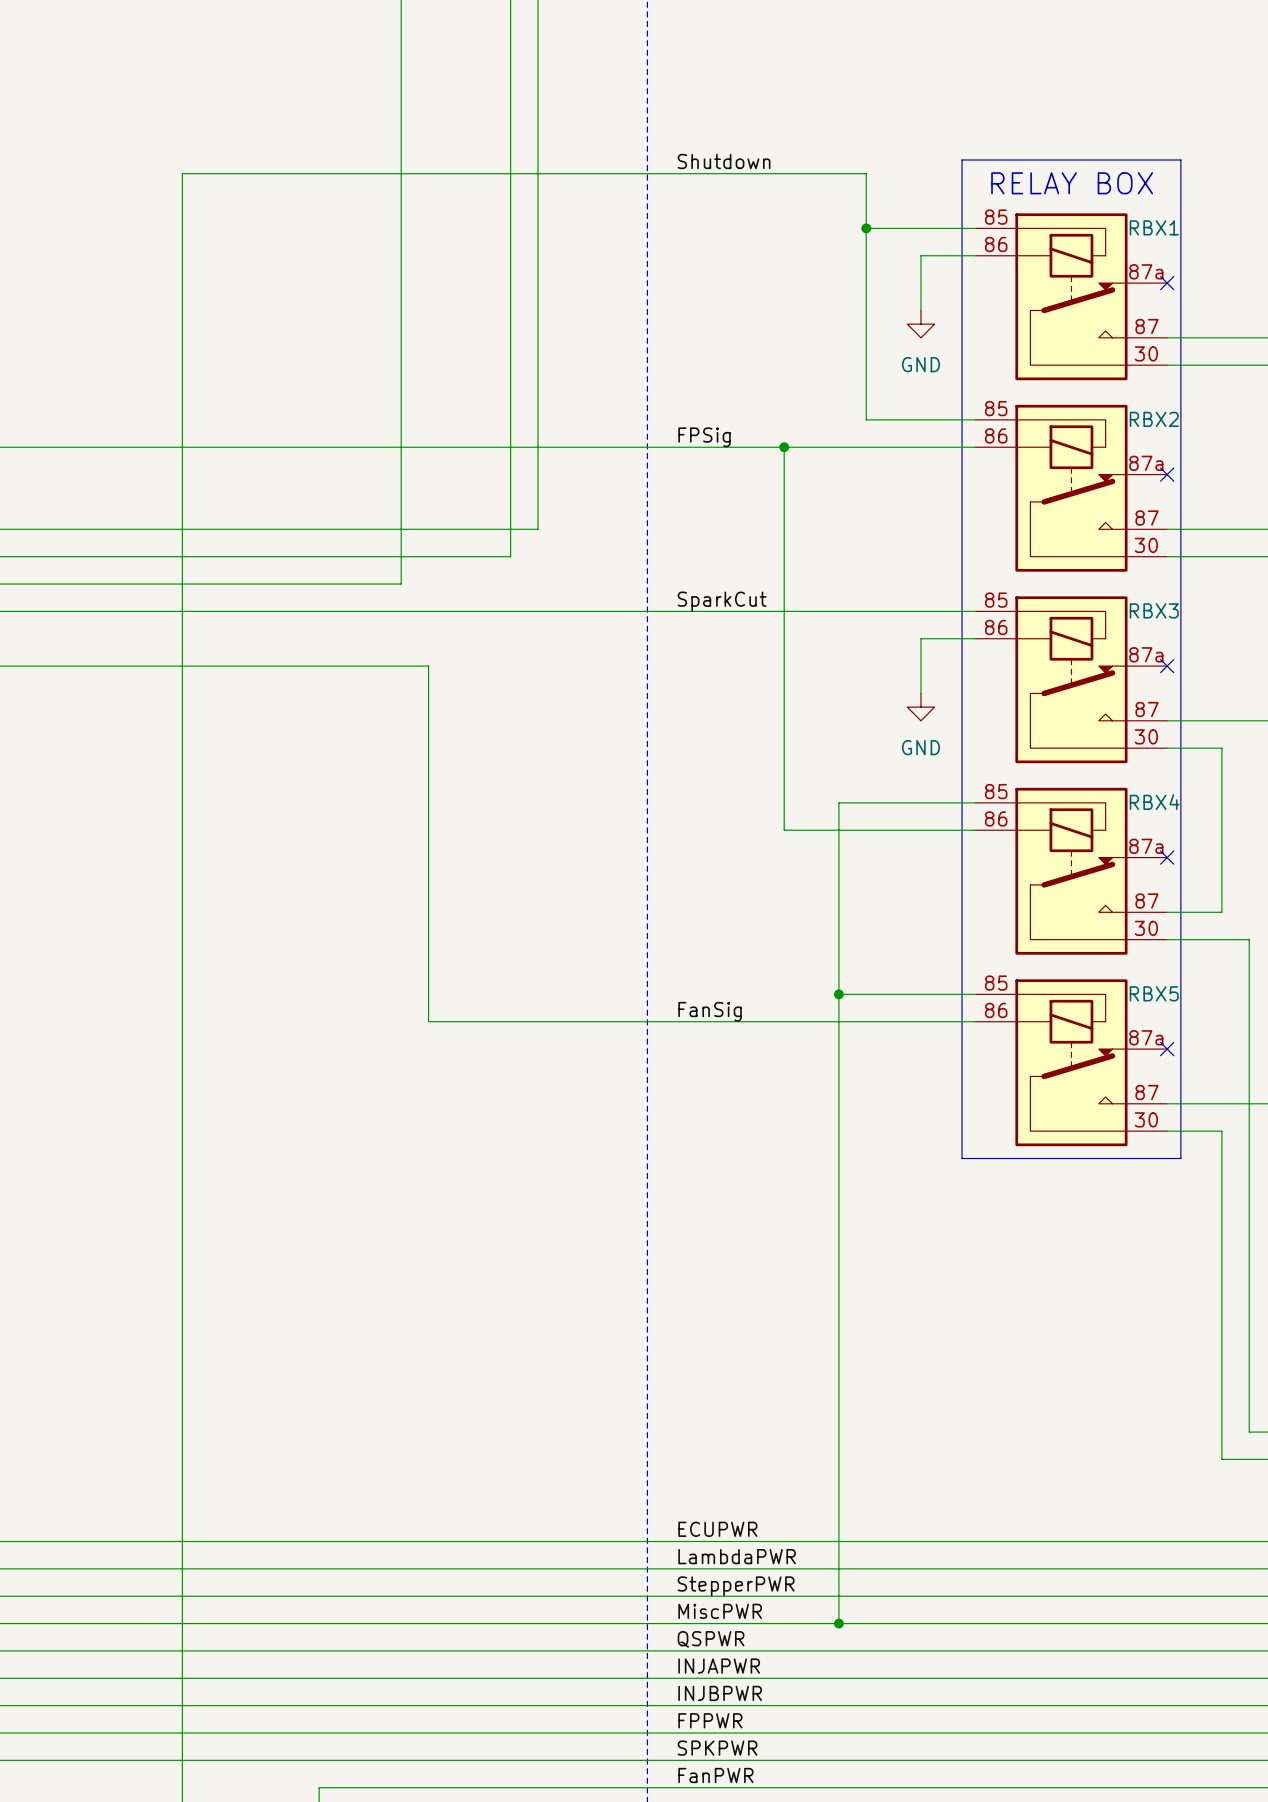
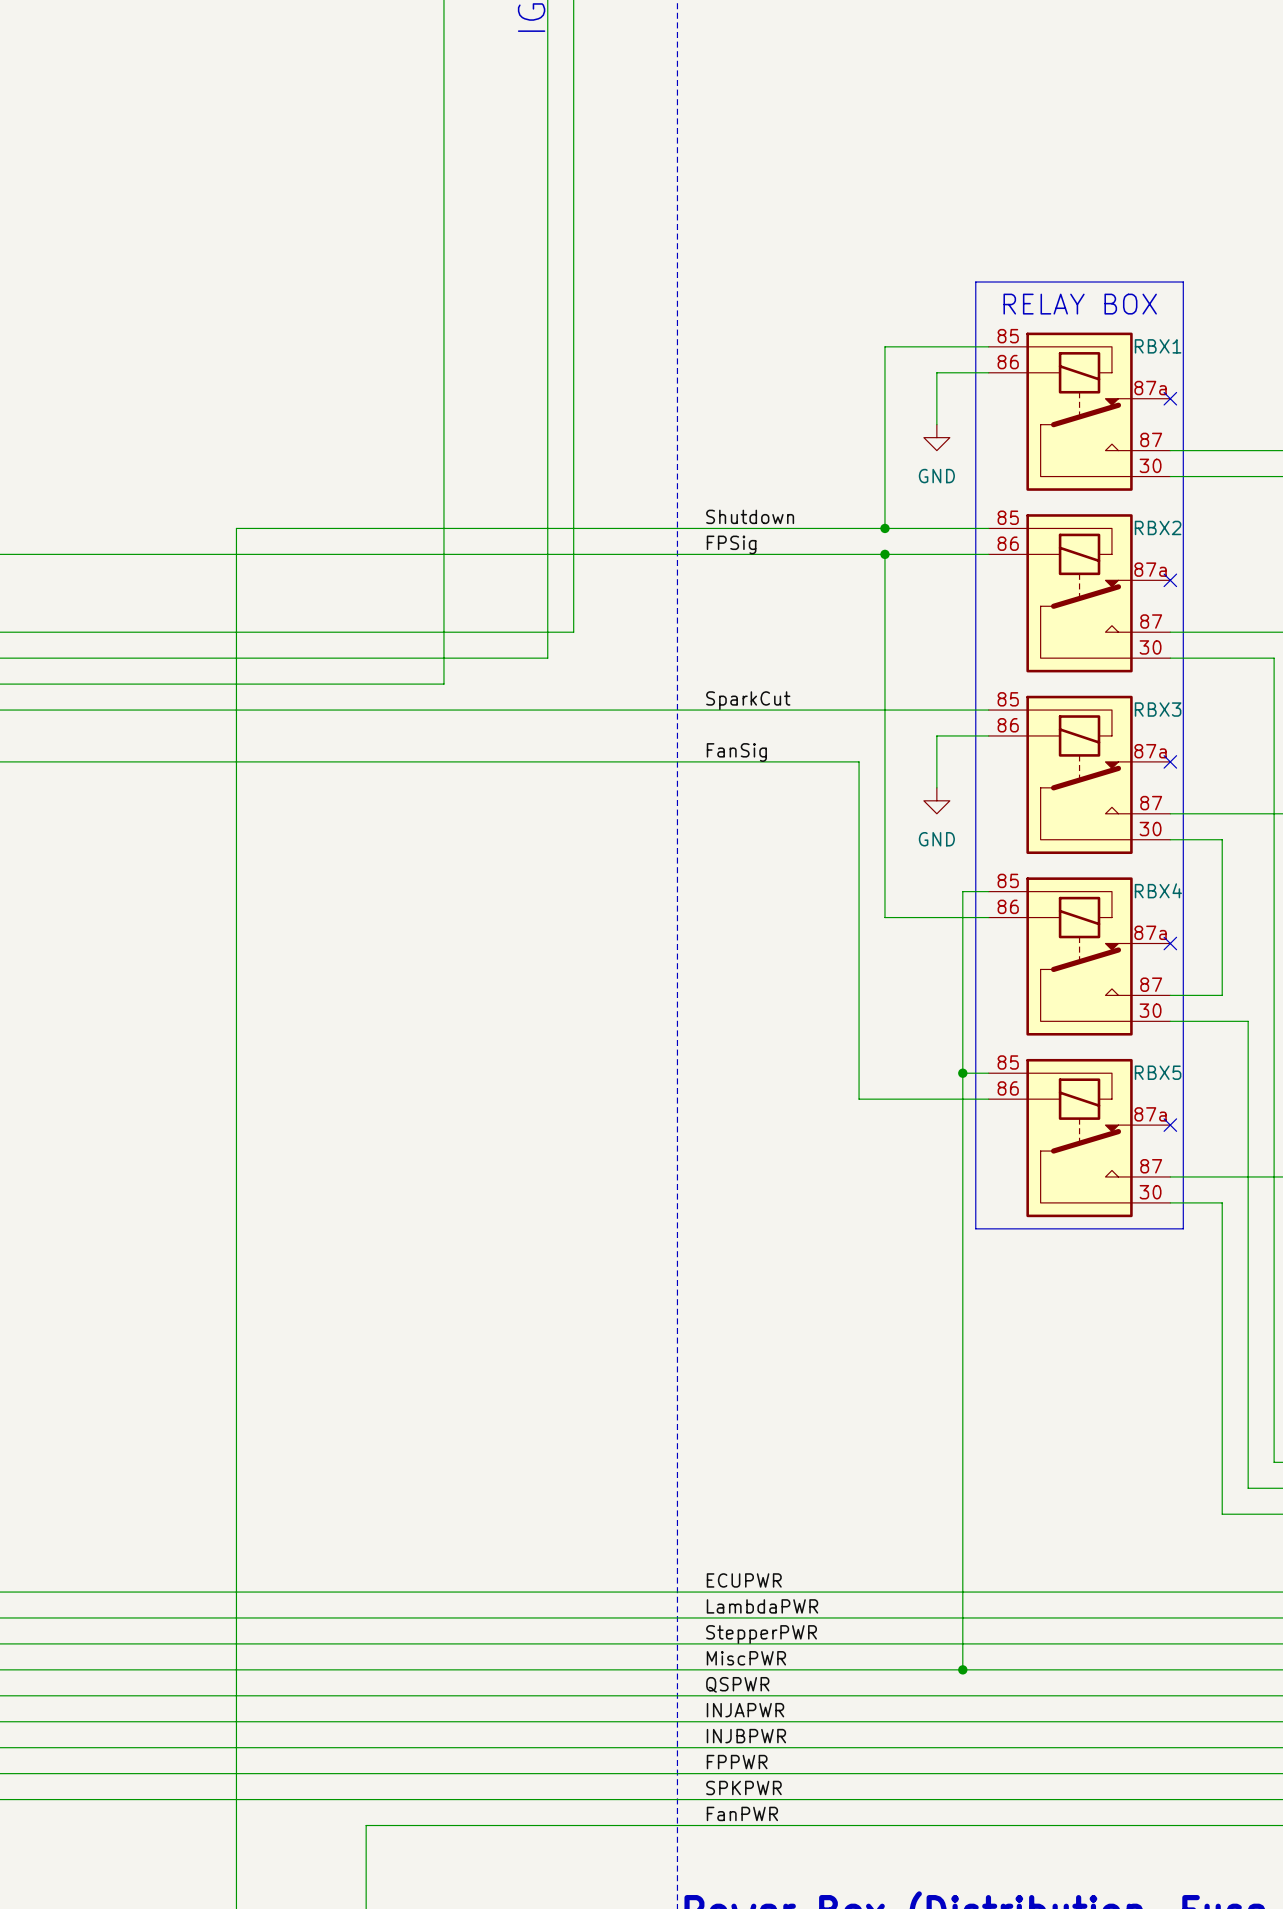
label position: Shutdown (724, 161) -> Shutdown (750, 516)
wire: (866, 228) (866, 173) (182, 173) (182, 419) -> (884, 528) (236, 528)
junction: (866, 228) -> none
junction: none -> (884, 528)
wire: (784, 447) (784, 830) (866, 830) -> (884, 554) (884, 917)
junction: (784, 447) -> none
junction: none -> (884, 554)
label: none -> FanSig (736, 752)
wire: (428, 666) (428, 1021) (838, 1021) (838, 1623) -> none
wire: (838, 802) (948, 802) -> (859, 891) (859, 761) (469, 761)
wire: none -> (962, 891) (962, 1669)
wire: (838, 994) (948, 994) -> none
junction: (838, 994) -> none
junction: none -> (962, 1073)
label: FanSig (710, 1011) -> none
junction: (838, 1623) -> none
junction: none -> (962, 1669)

